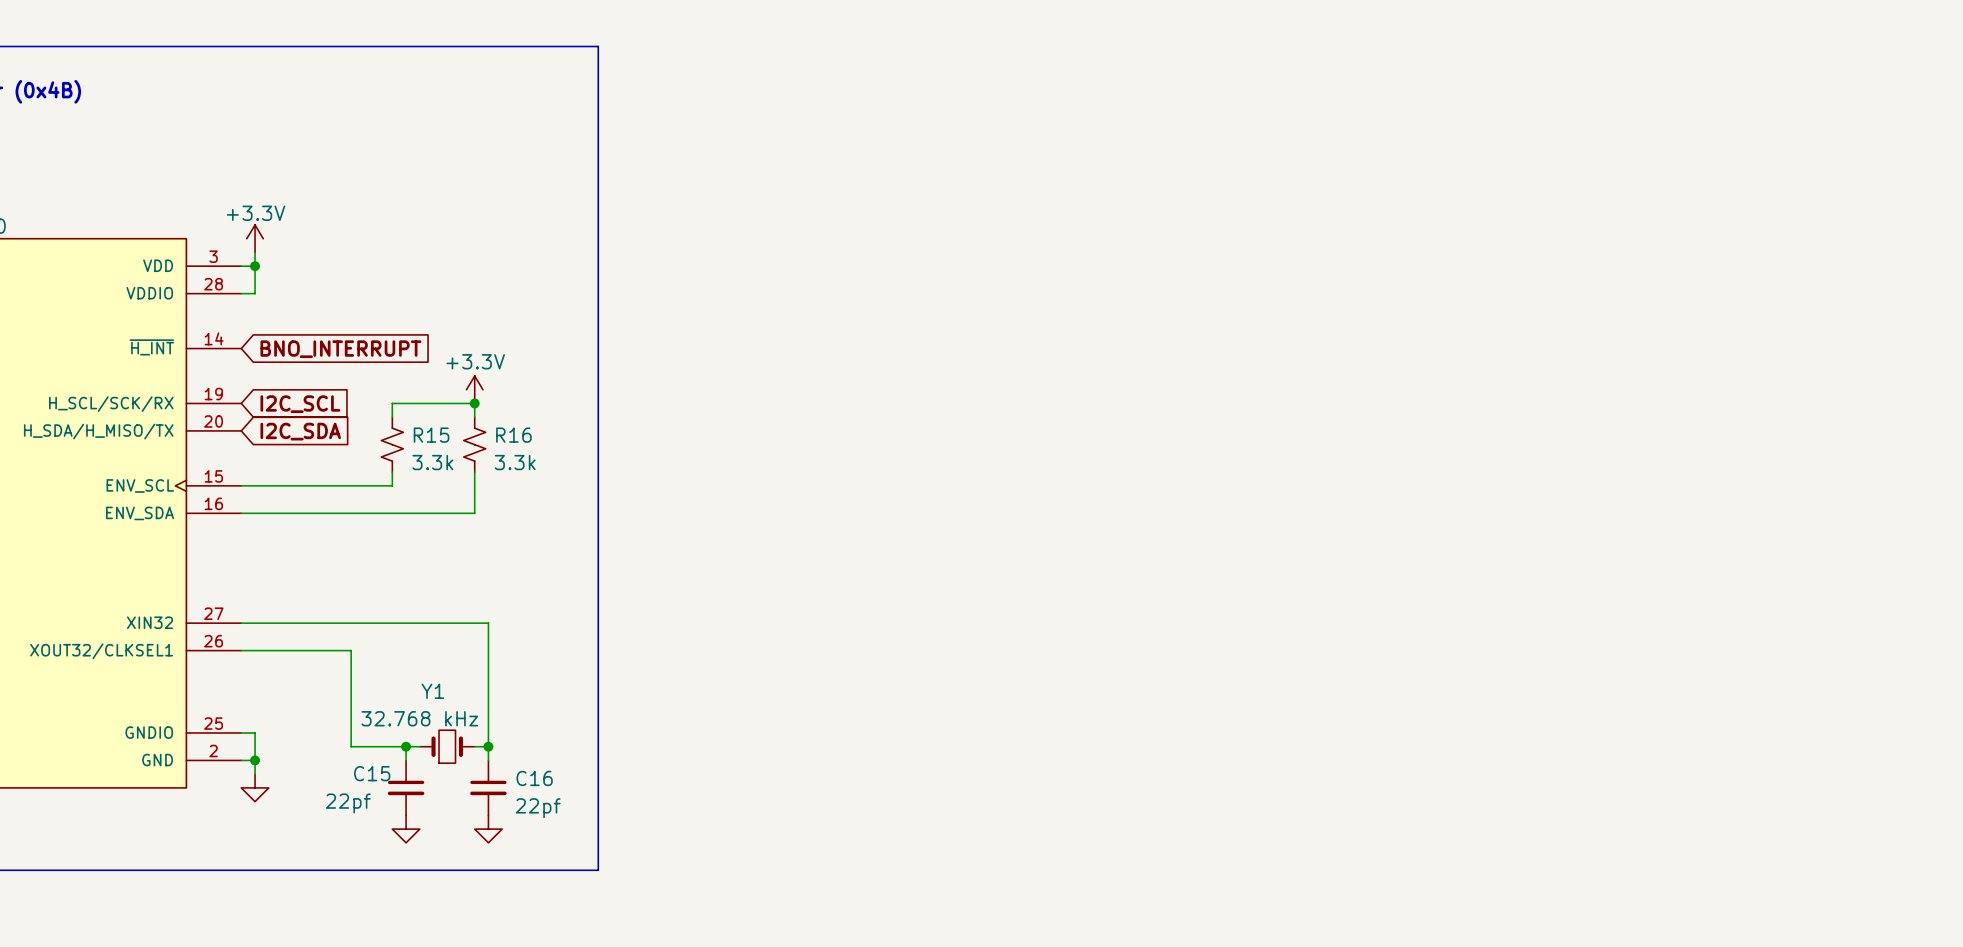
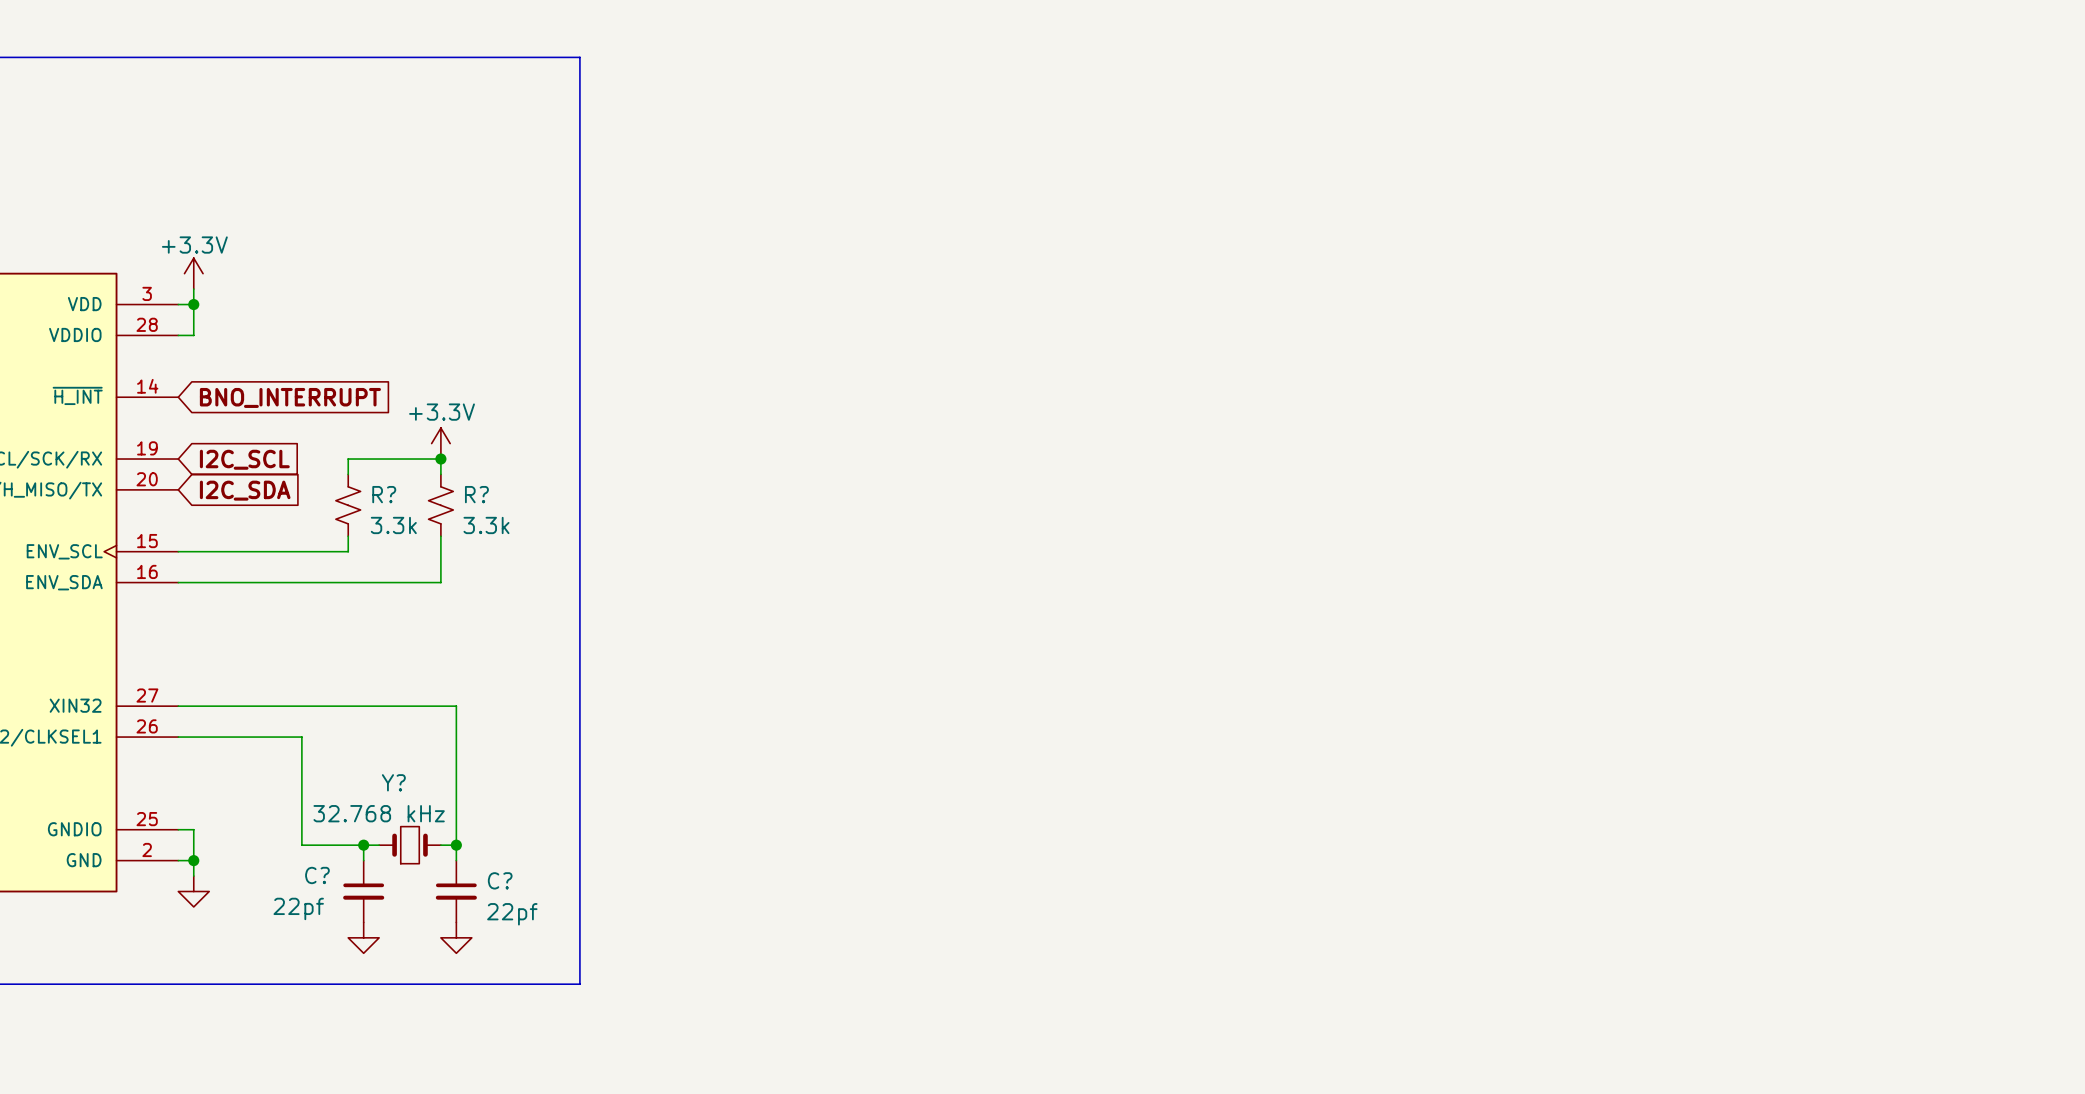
R15 name: R15 (431, 435) -> R? (384, 494)
R16 name: R16 (513, 435) -> R? (476, 494)
Y1 name: Y1 (432, 691) -> Y? (393, 782)
C15 name: C15 (372, 773) -> C? (317, 875)
C16 name: C16 (534, 778) -> C? (500, 880)

